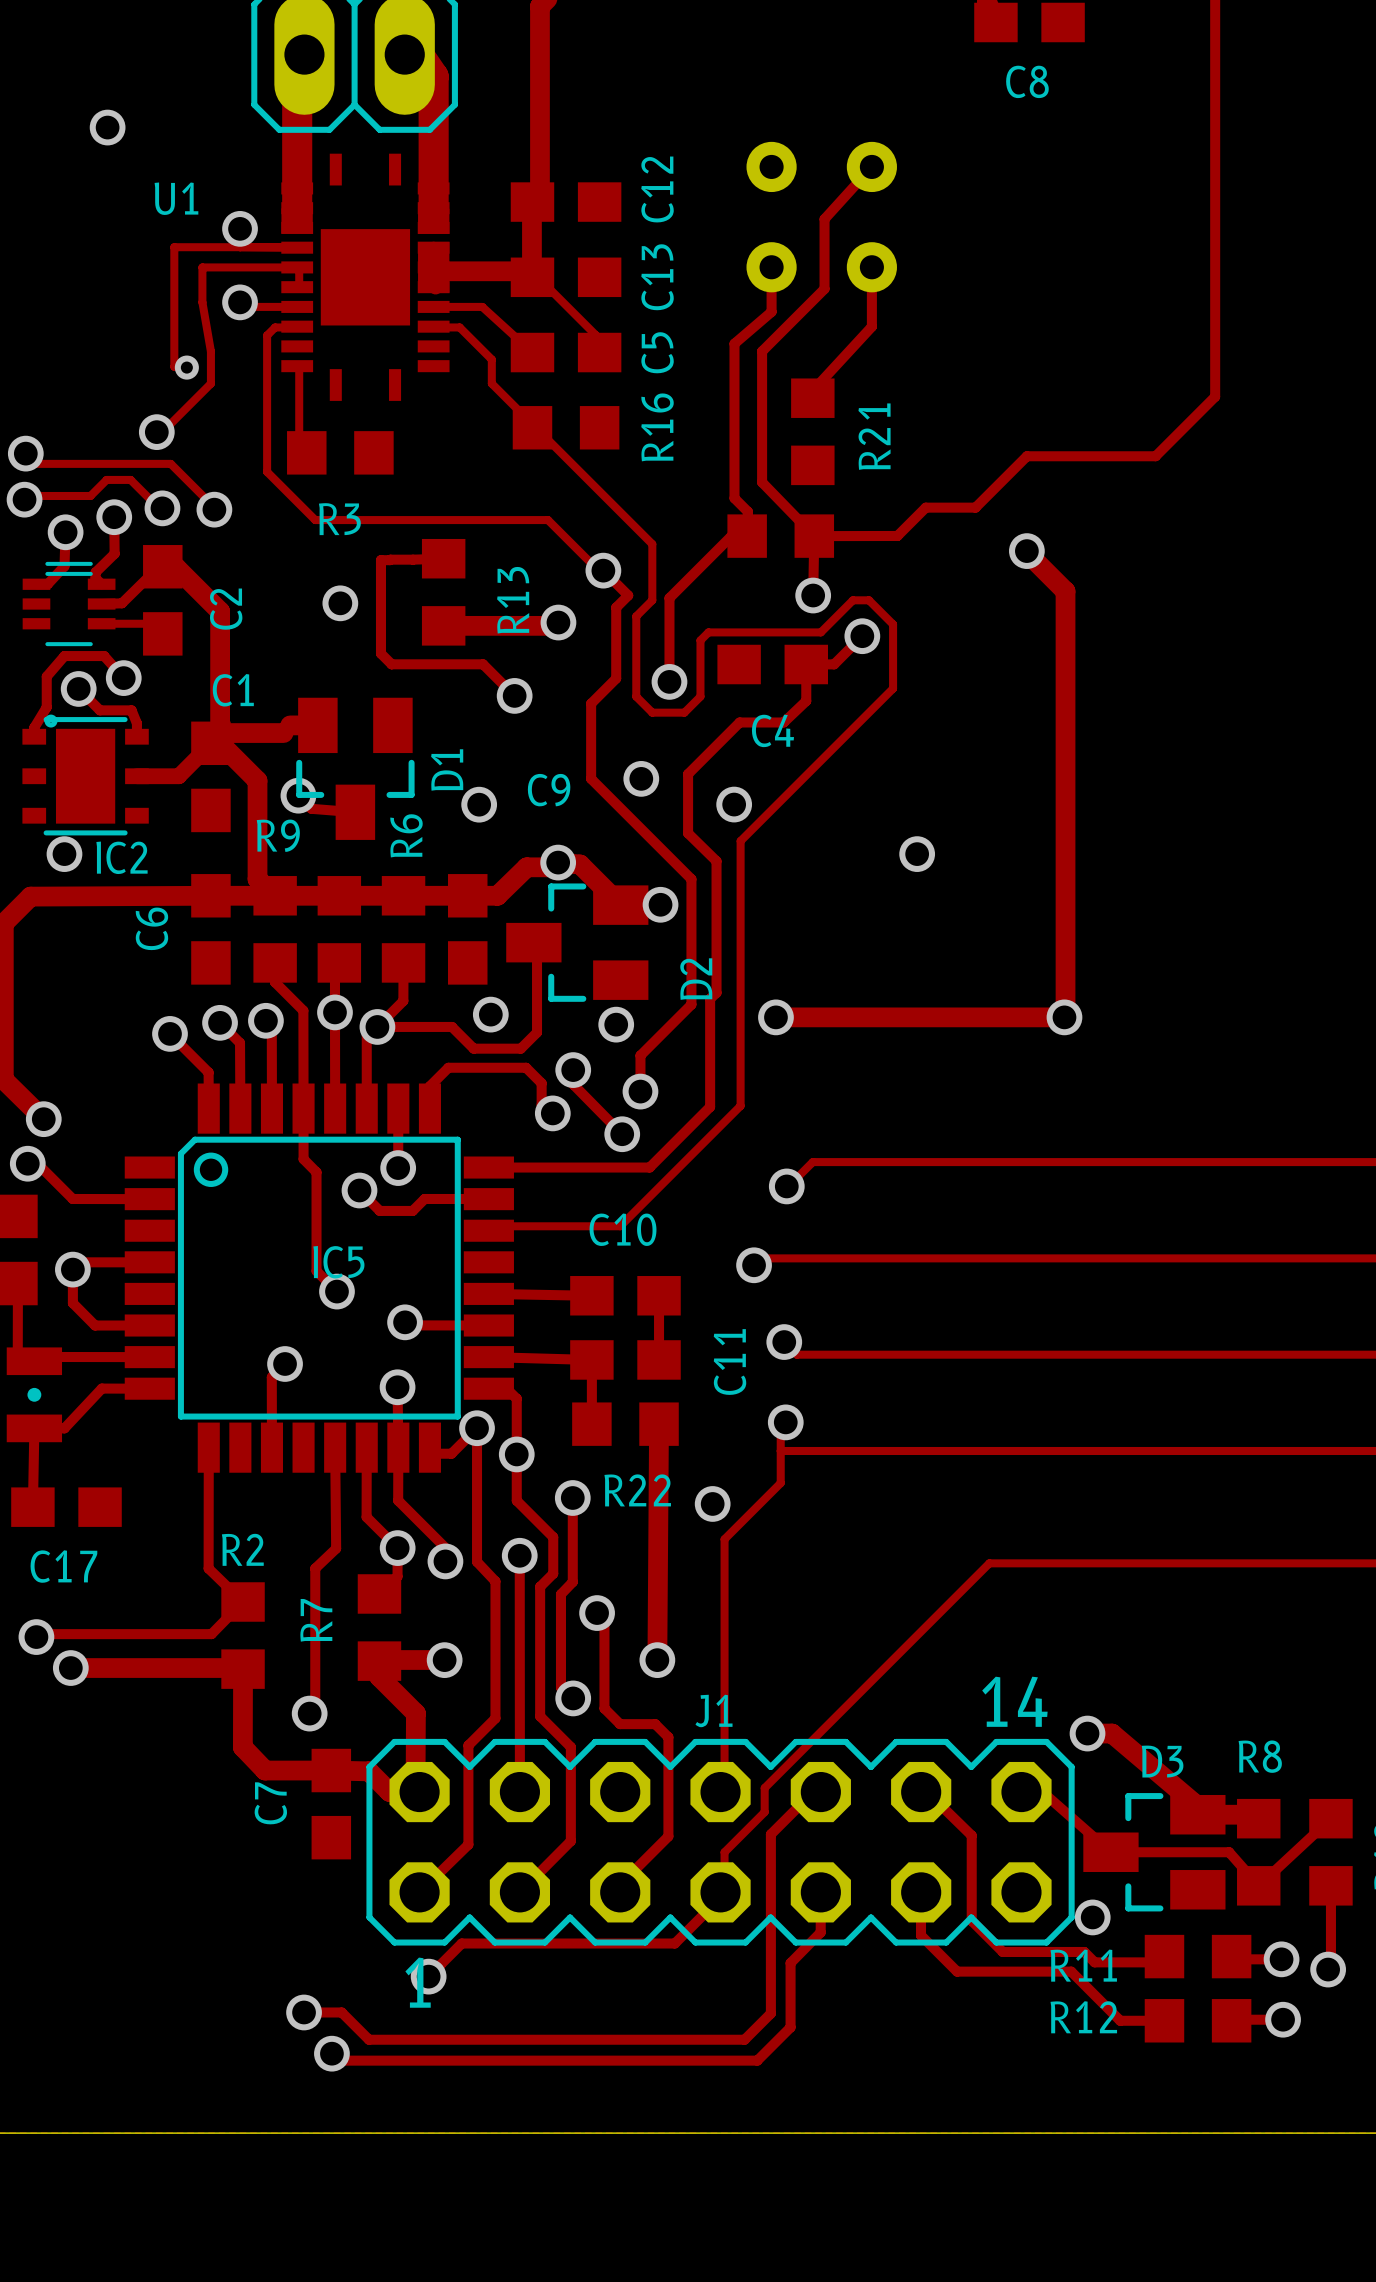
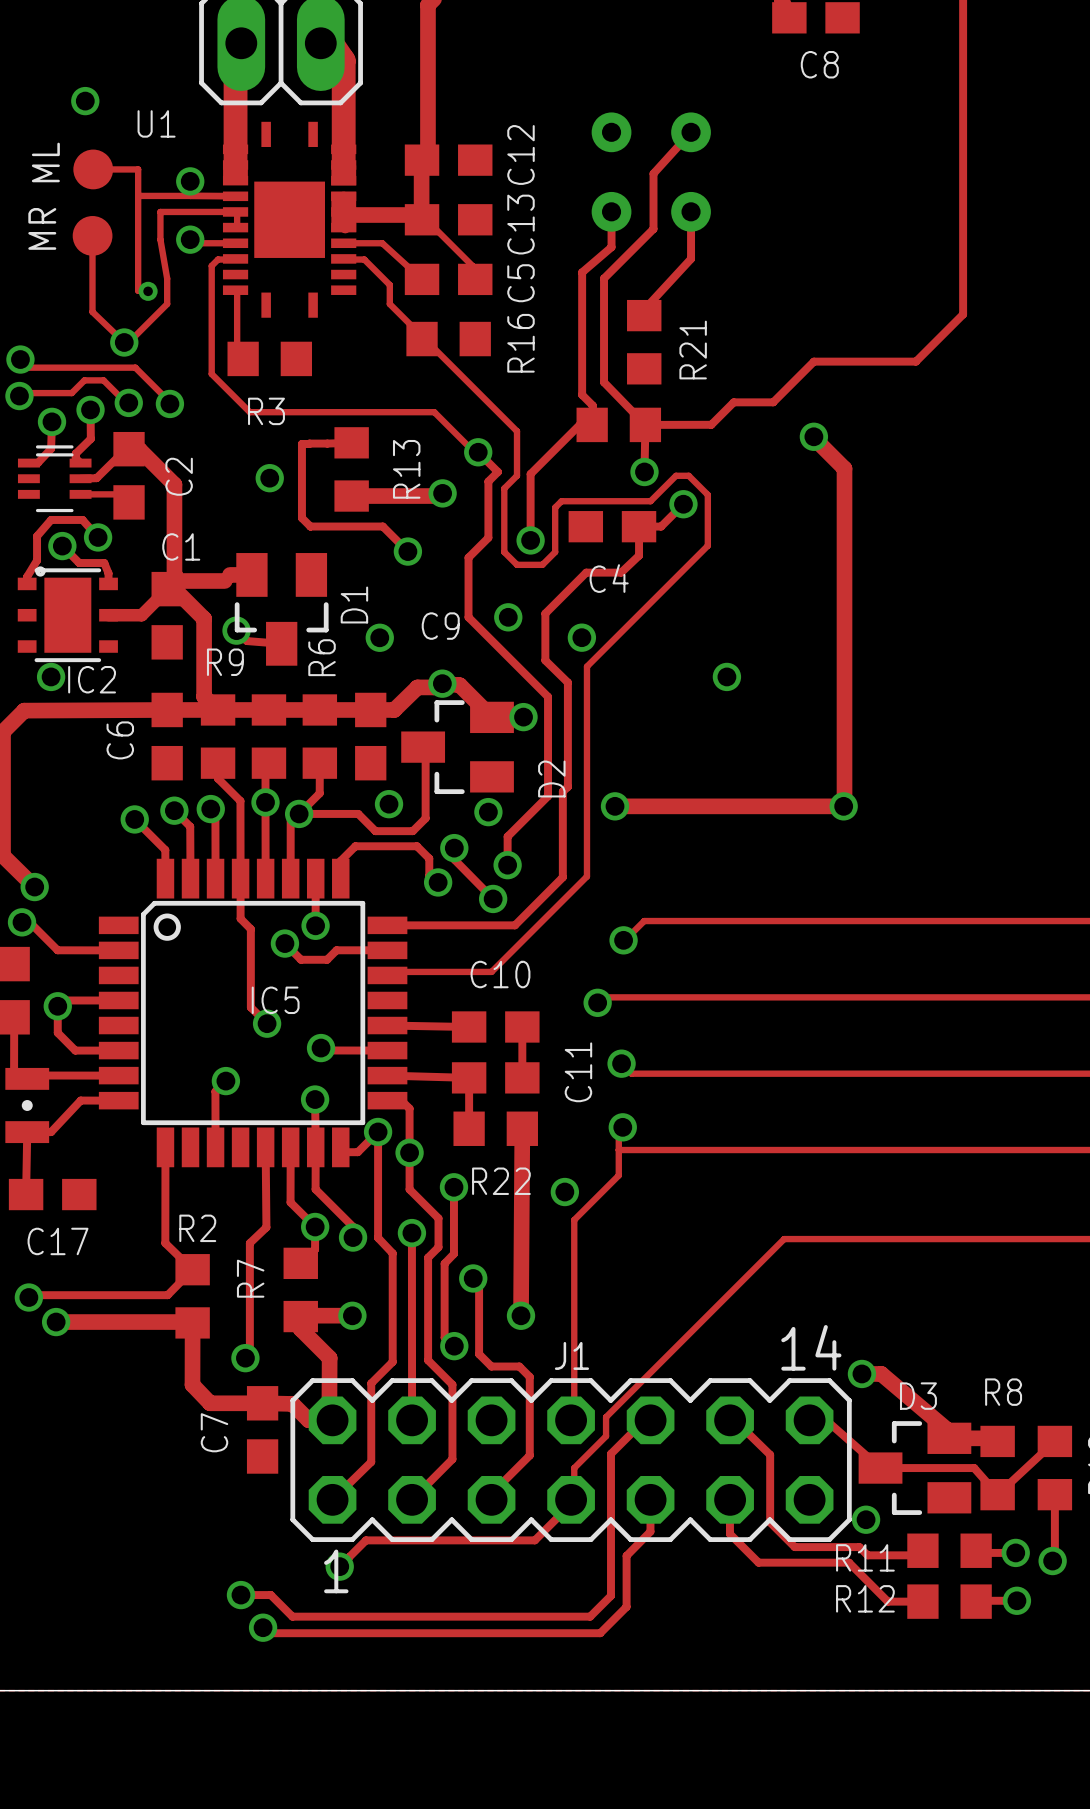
U1 name position: U1 (176, 198) -> U1 (156, 123)
track: none -> (93, 169) (138, 169) (138, 195)
ML: none -> (93, 169)
track: none -> (92, 235) (92, 311) (124, 342)
MR: none -> (92, 235)

